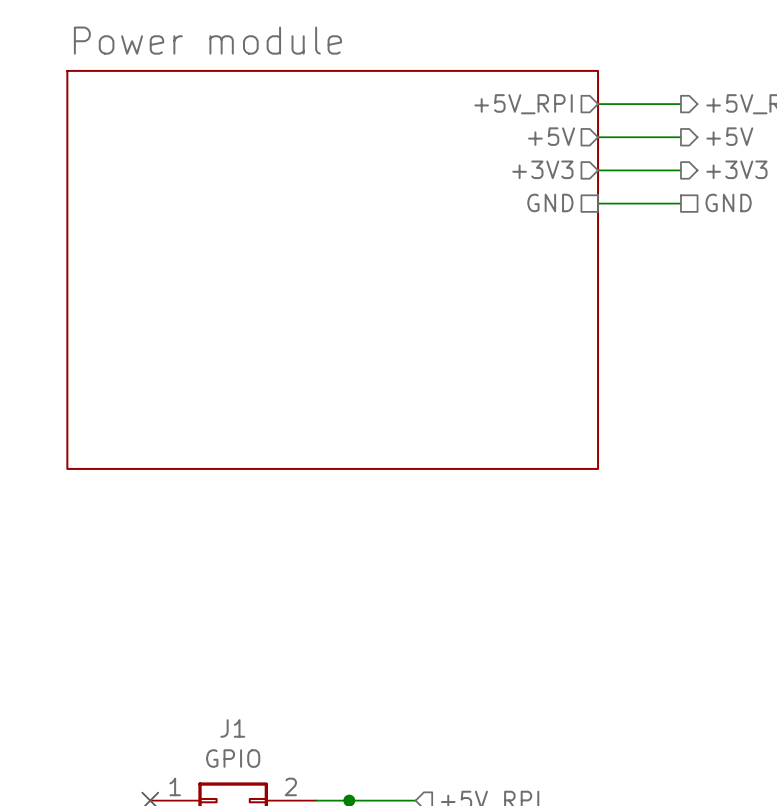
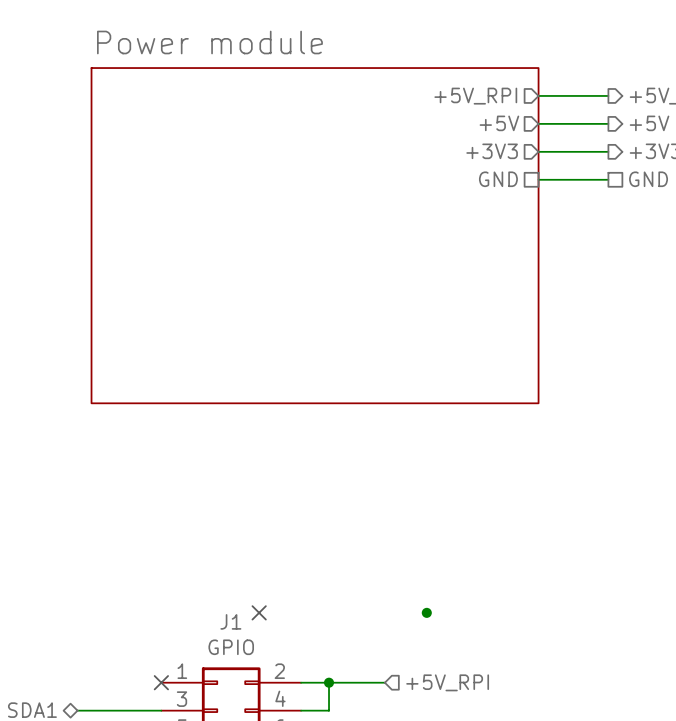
no-connect mark: none -> (259, 612)
junction: none -> (426, 612)

